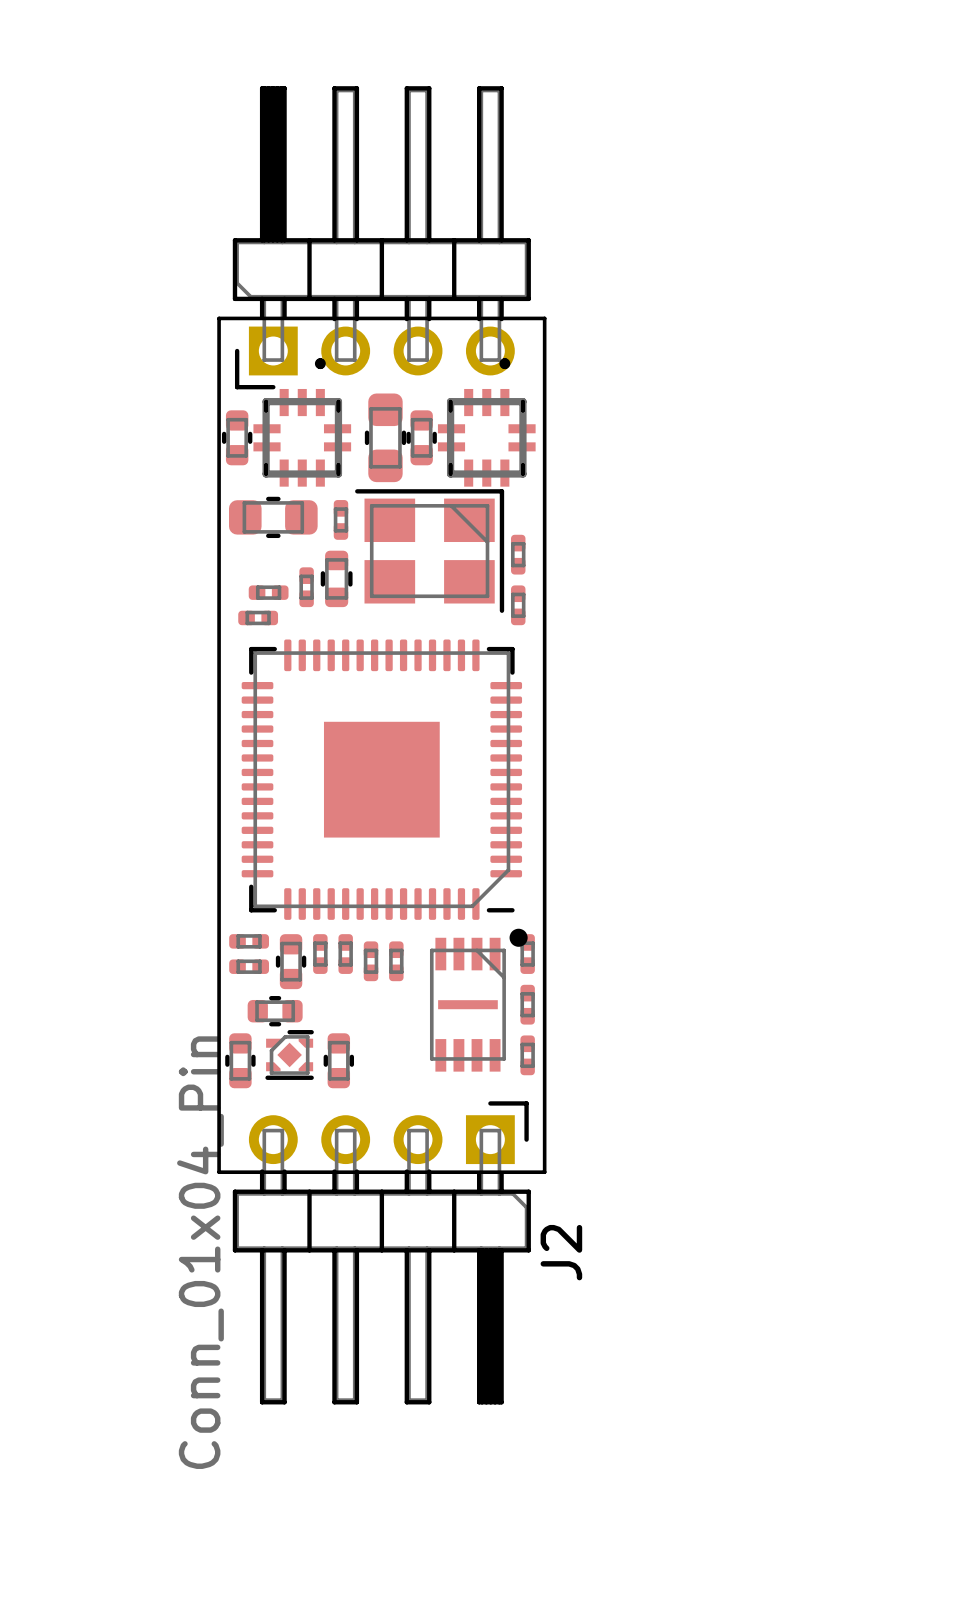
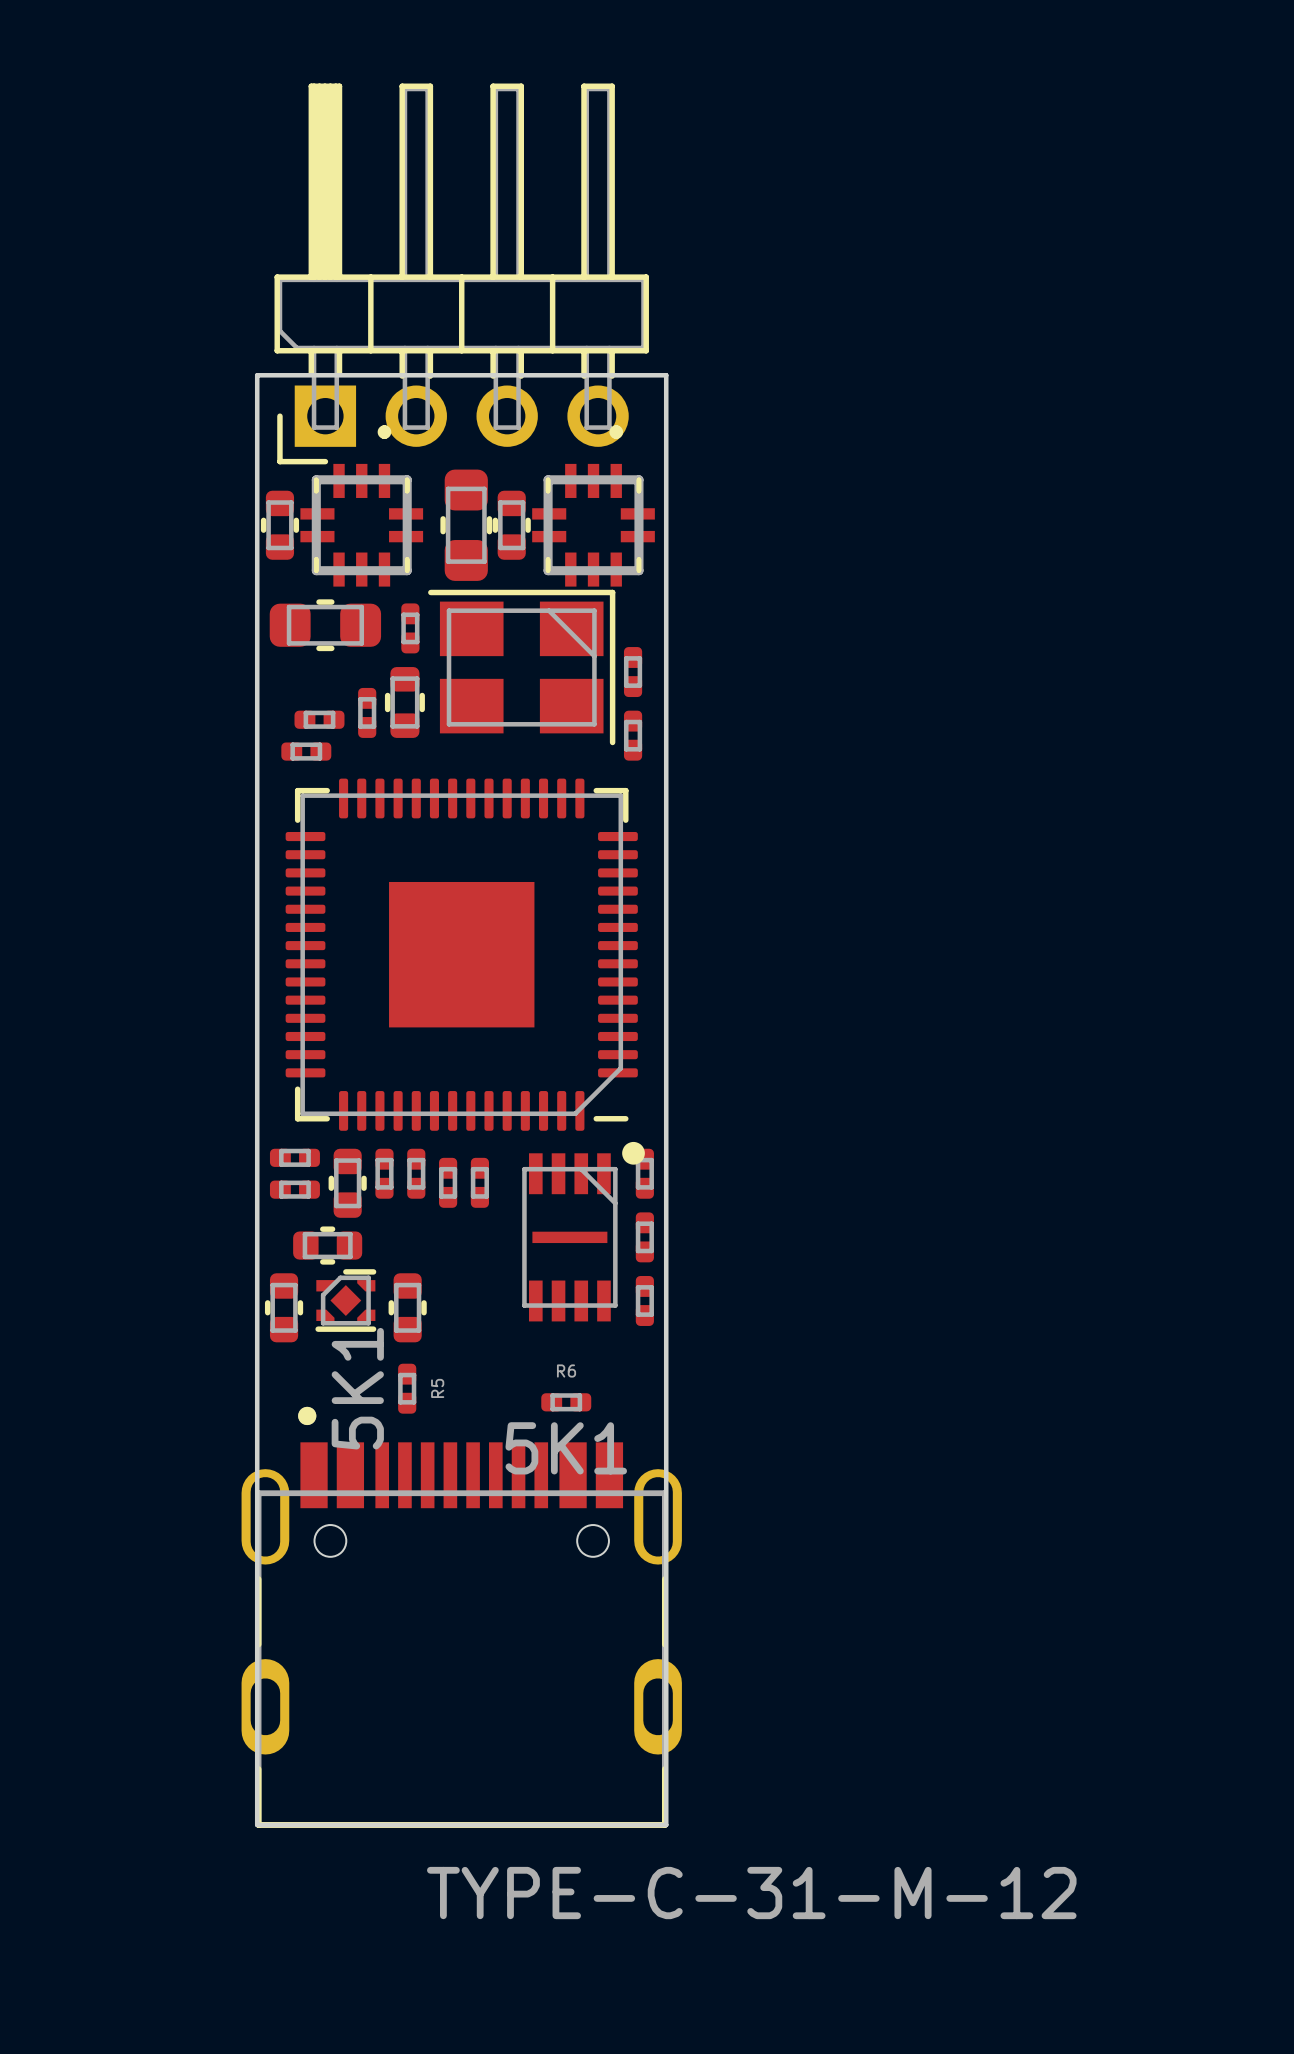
R5: none -> 5K1 (407, 1388)
R6: none -> 5K1 (566, 1402)
board edge: (219, 1172) (544, 1172) -> (257, 1447) (257, 1824) (666, 1824) (666, 1447)
J2: Conn_01x04_Pin (381, 1252) -> none
part: none -> TYPE-C-31-M-12 (461, 1617)

